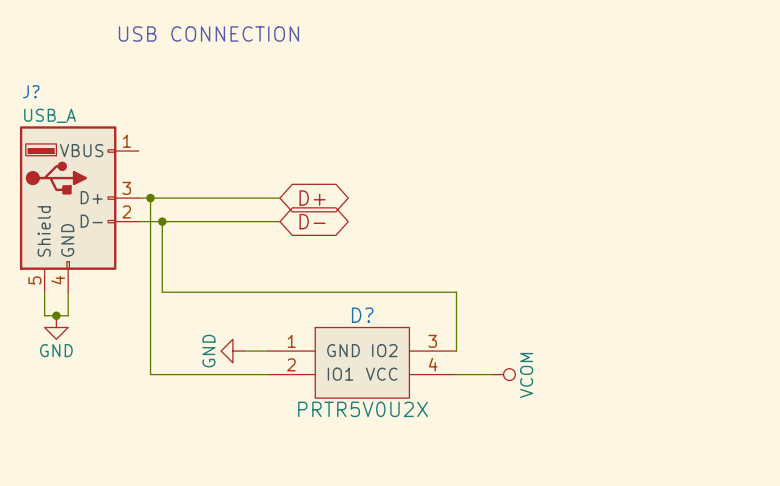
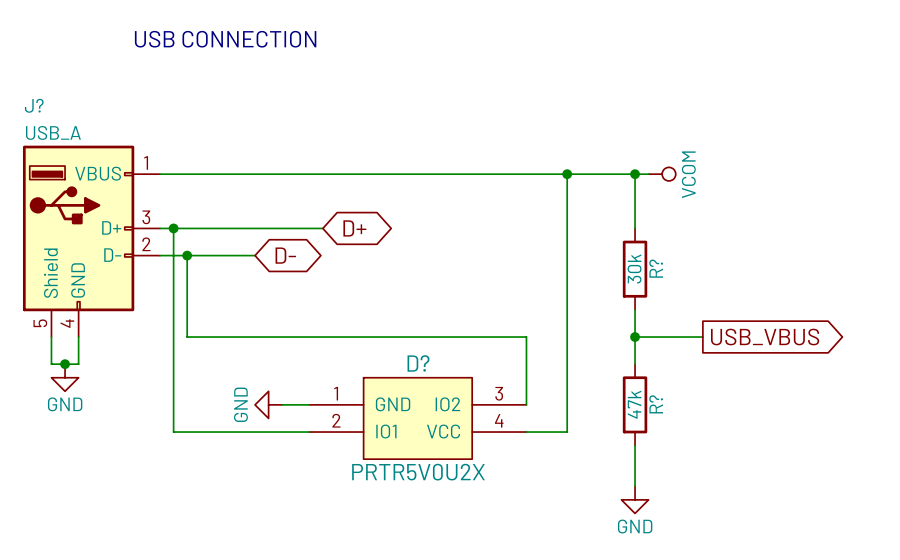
wire: none -> (160, 174) (648, 174)
wire: none -> (567, 174) (567, 432)
junction: none -> (567, 174)
wire: none -> (635, 174) (635, 228)
junction: none -> (635, 174)
power symbol: none -> VCOM (662, 174)
wire: (221, 221) (279, 221) -> none
global label position: D- (312, 221) -> D- (285, 255)
R?: none -> 30k (635, 269)
wire: none -> (635, 309) (635, 364)
wire: none -> (635, 337) (702, 337)
junction: none -> (635, 337)
global label: none -> USB_VBUS (765, 337)
R?: none -> 47k (635, 404)
power symbol: VCOM (503, 374) -> none
wire: none -> (635, 445) (635, 486)
power symbol: none -> GND (635, 499)

